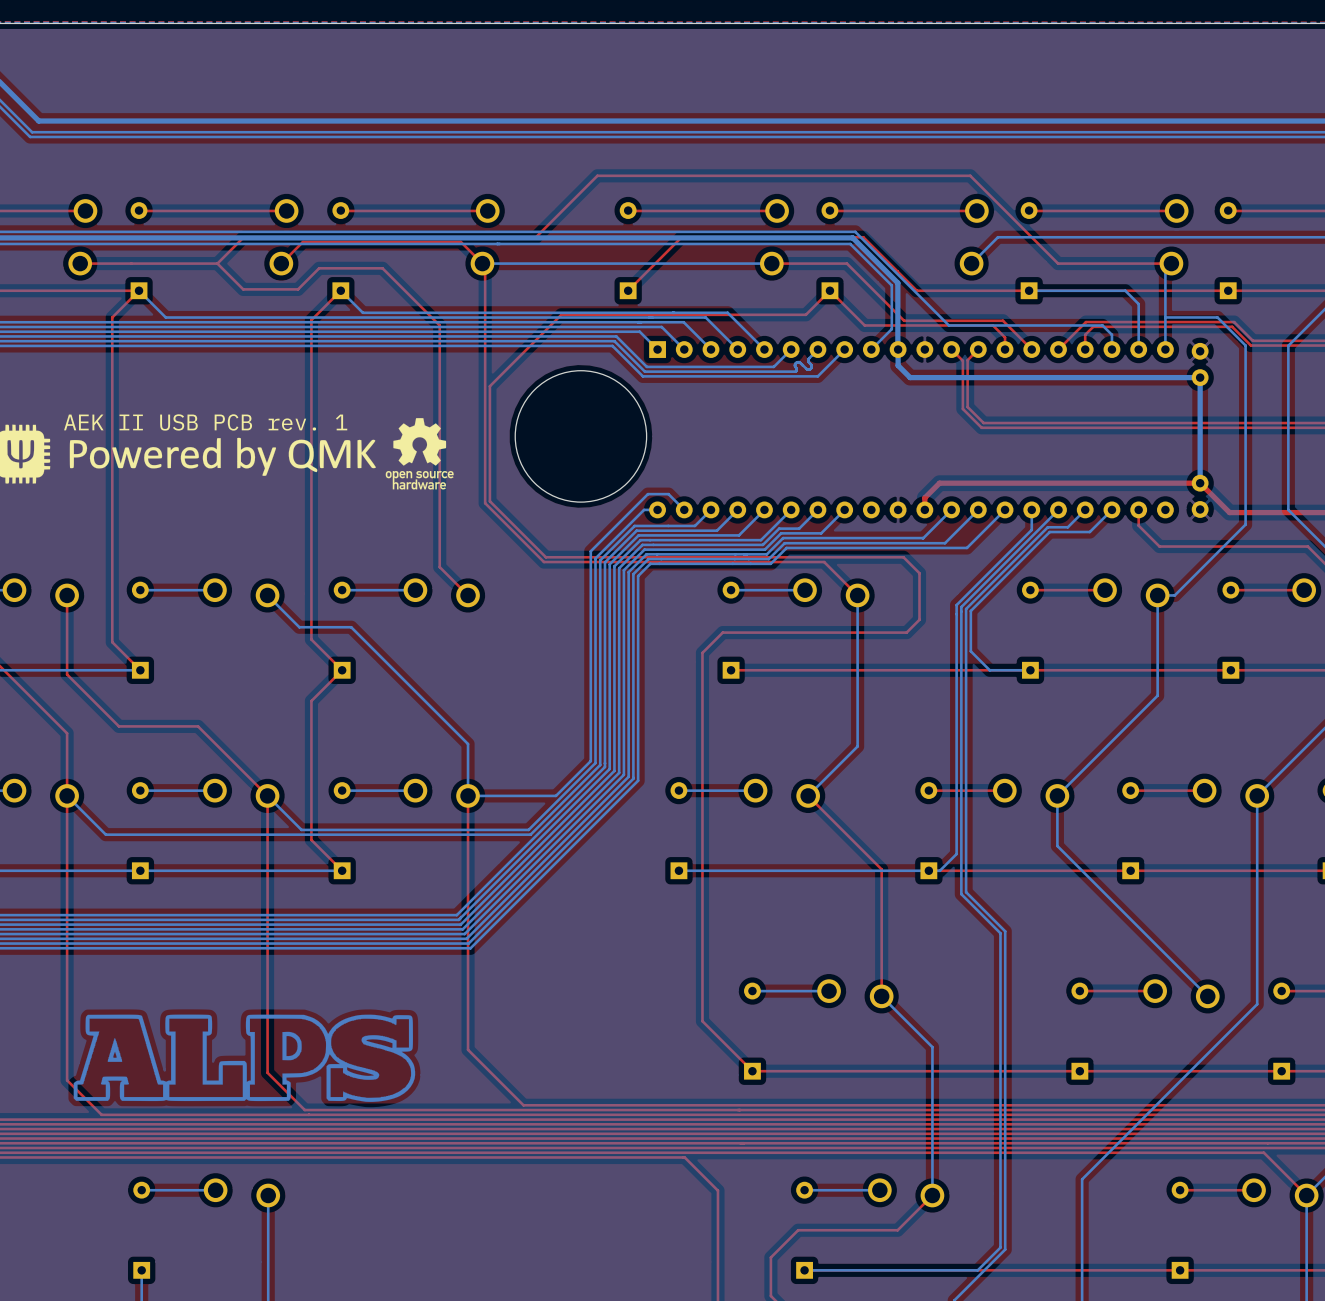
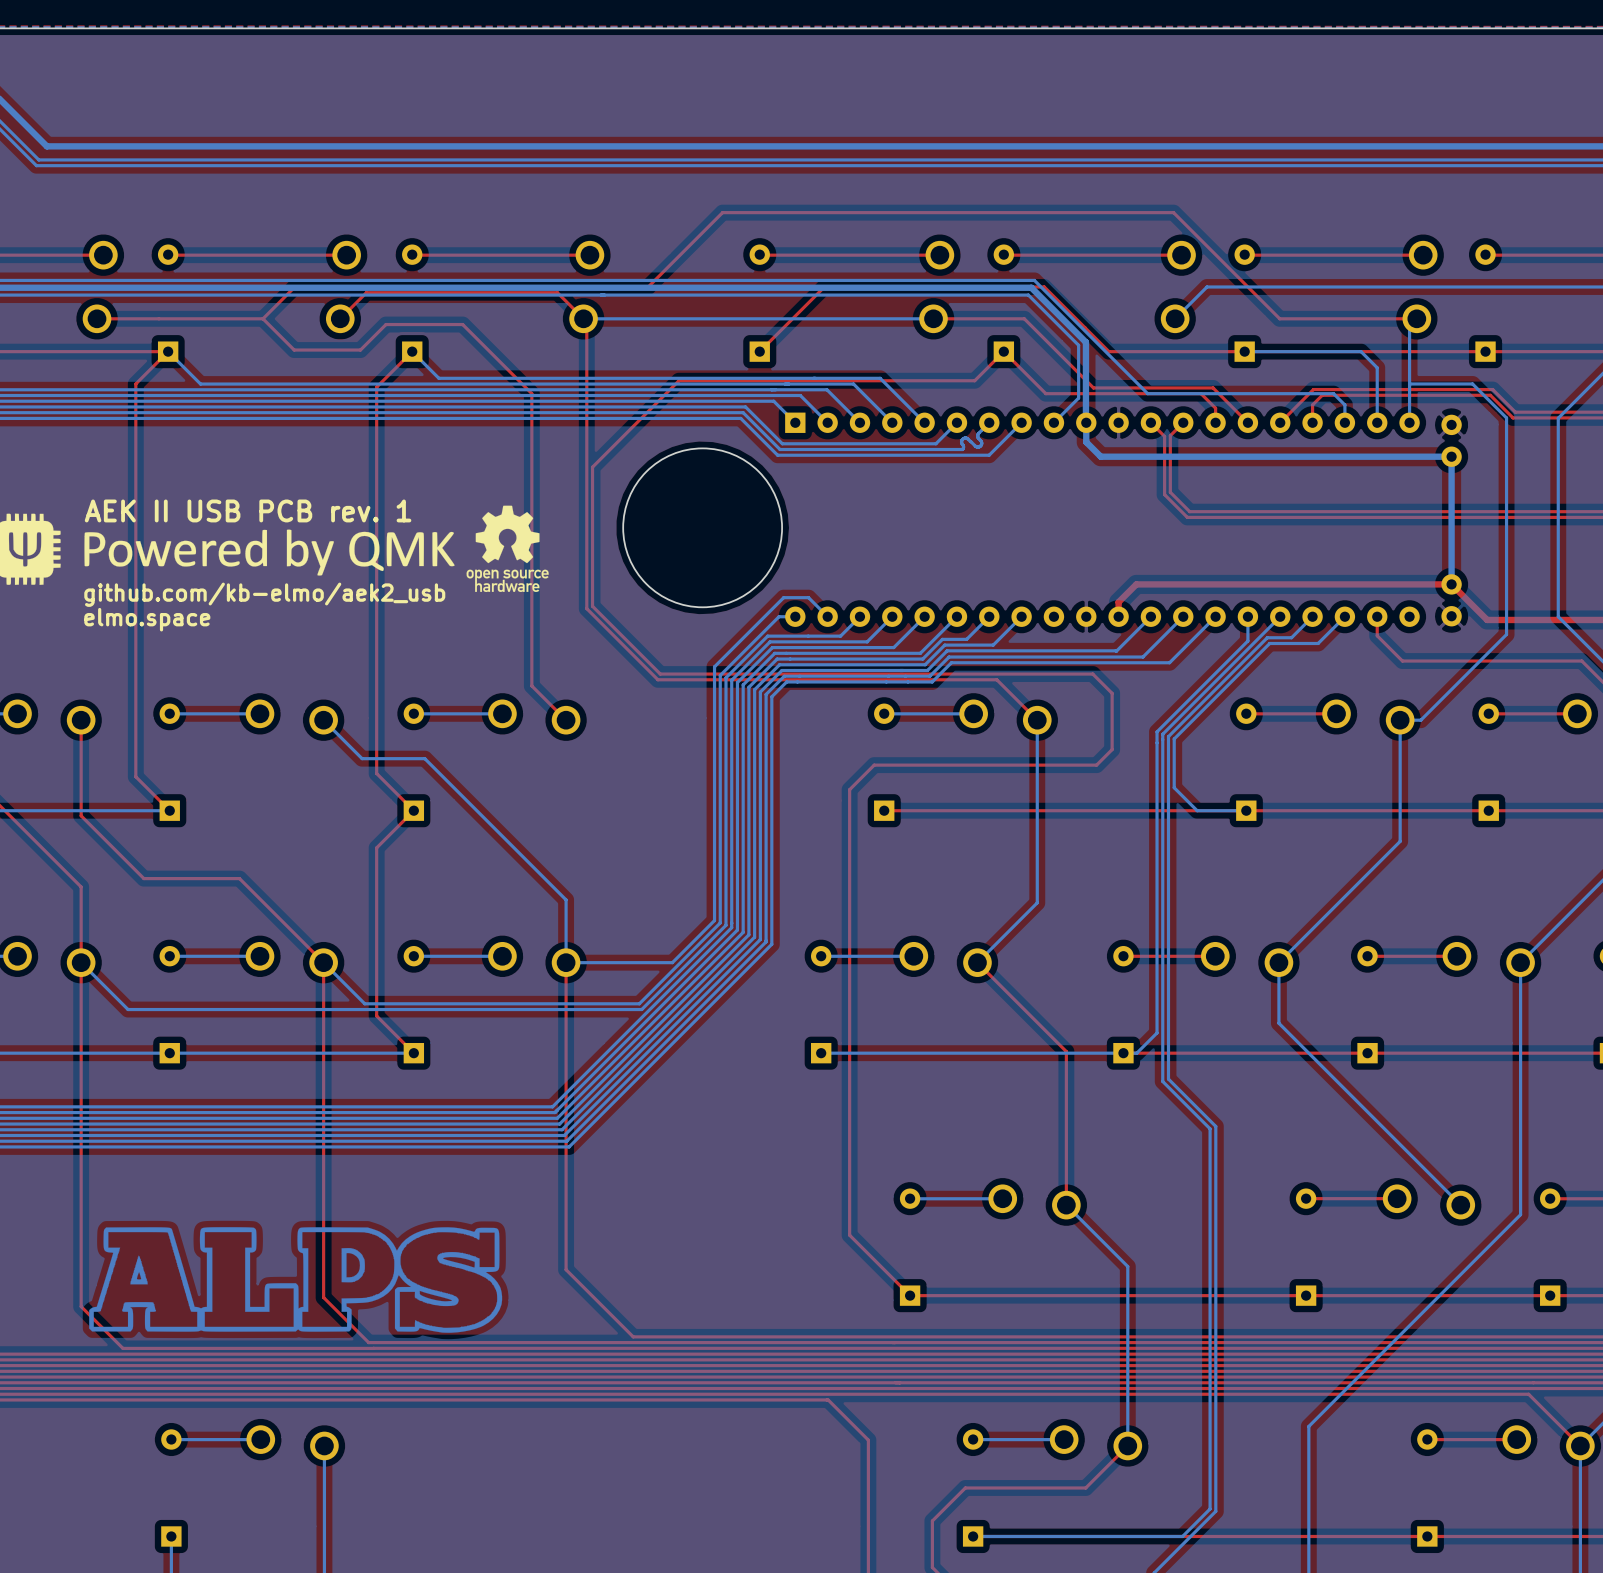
text: none -> github.com/kb-elmo/aek2_usb (264, 594)
text: none -> elmo.space (147, 619)

